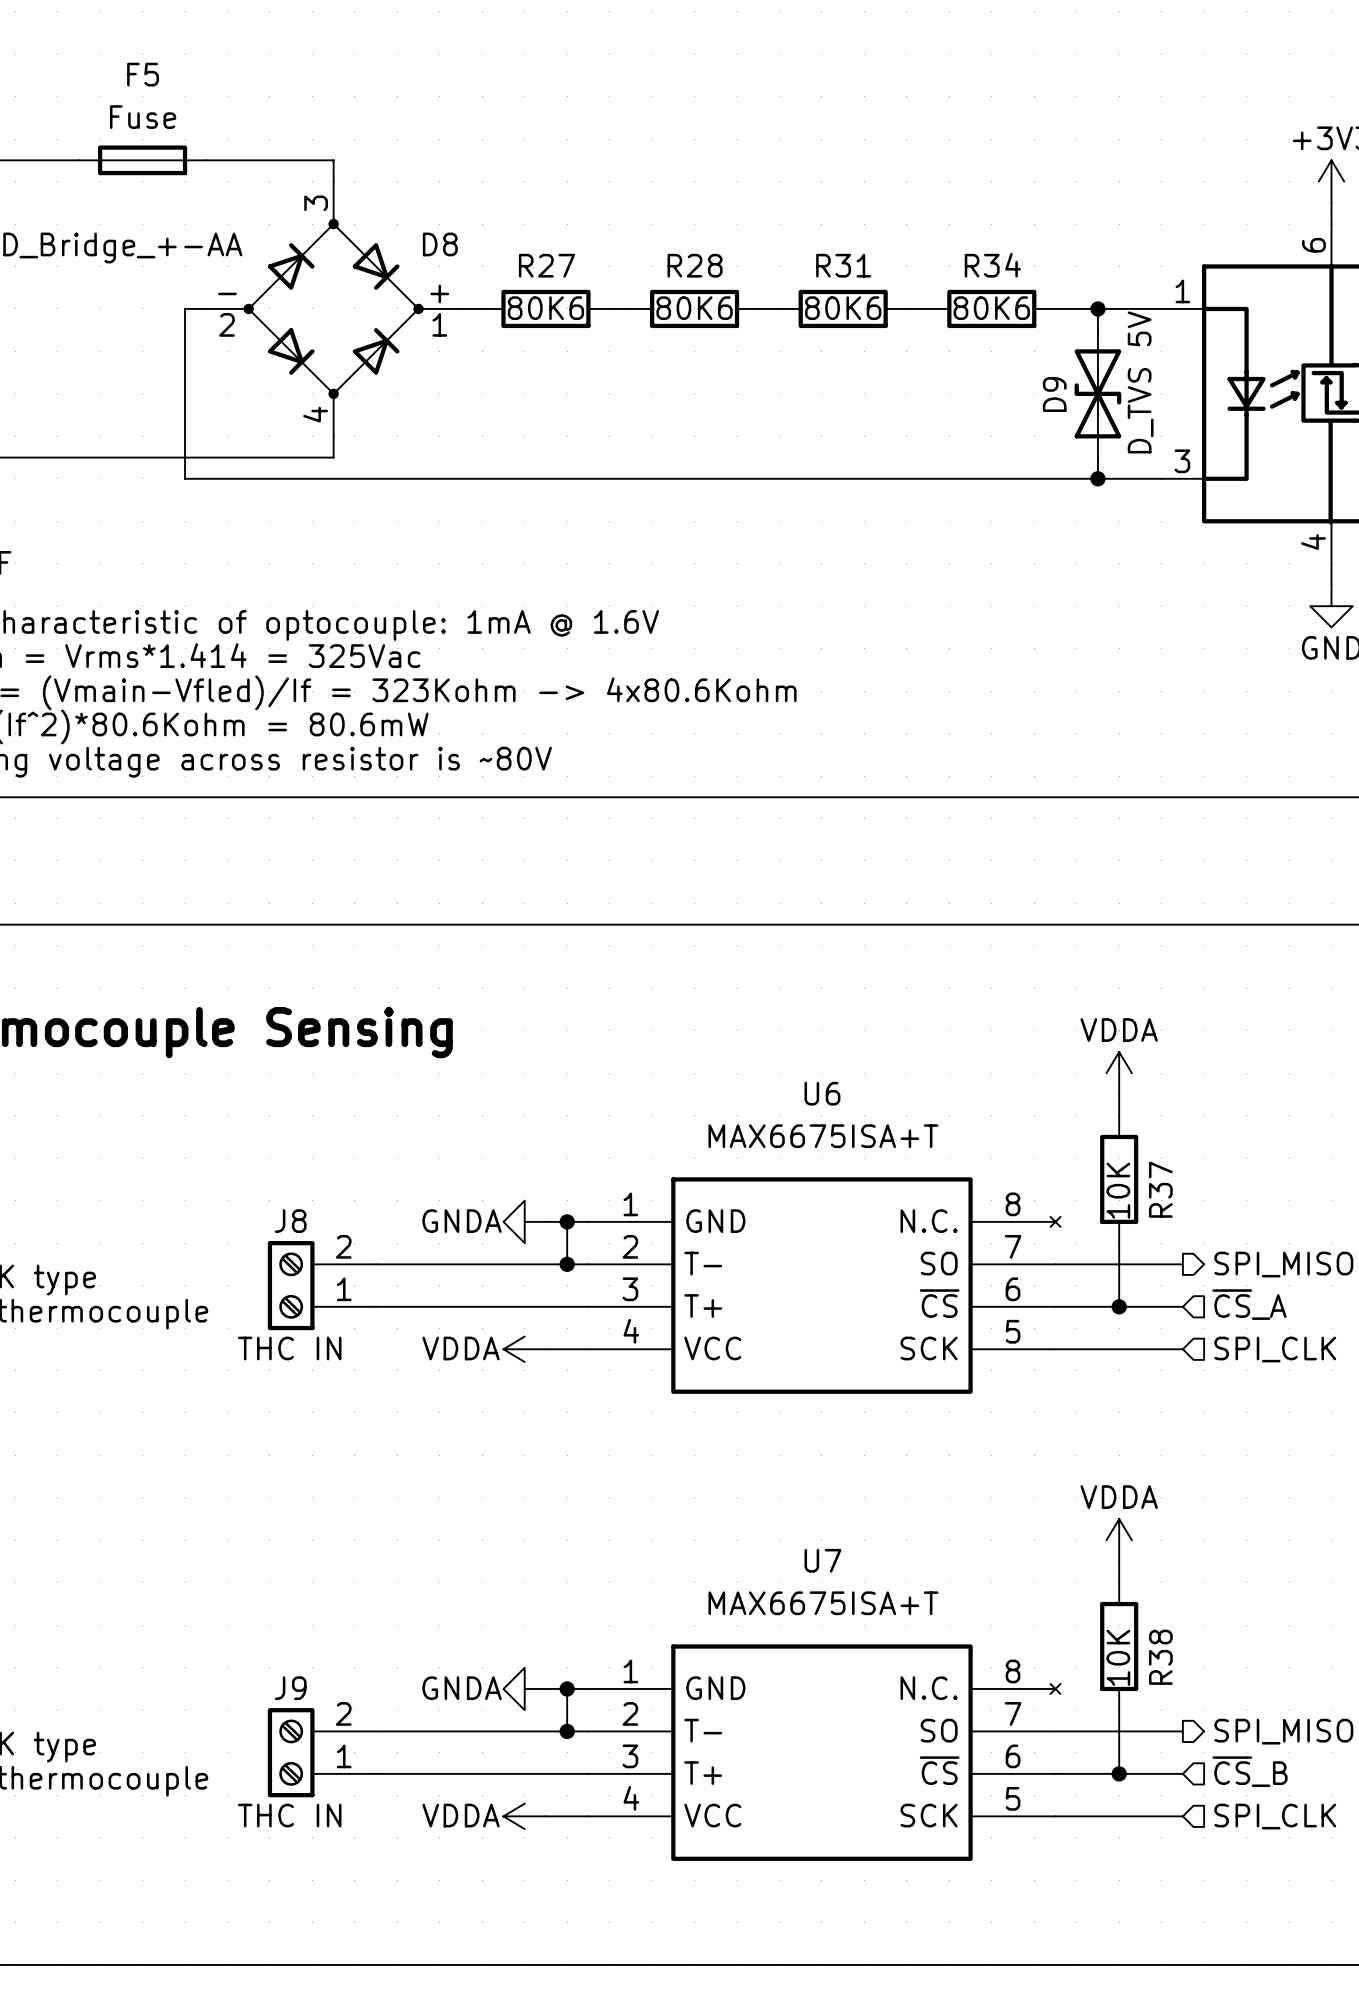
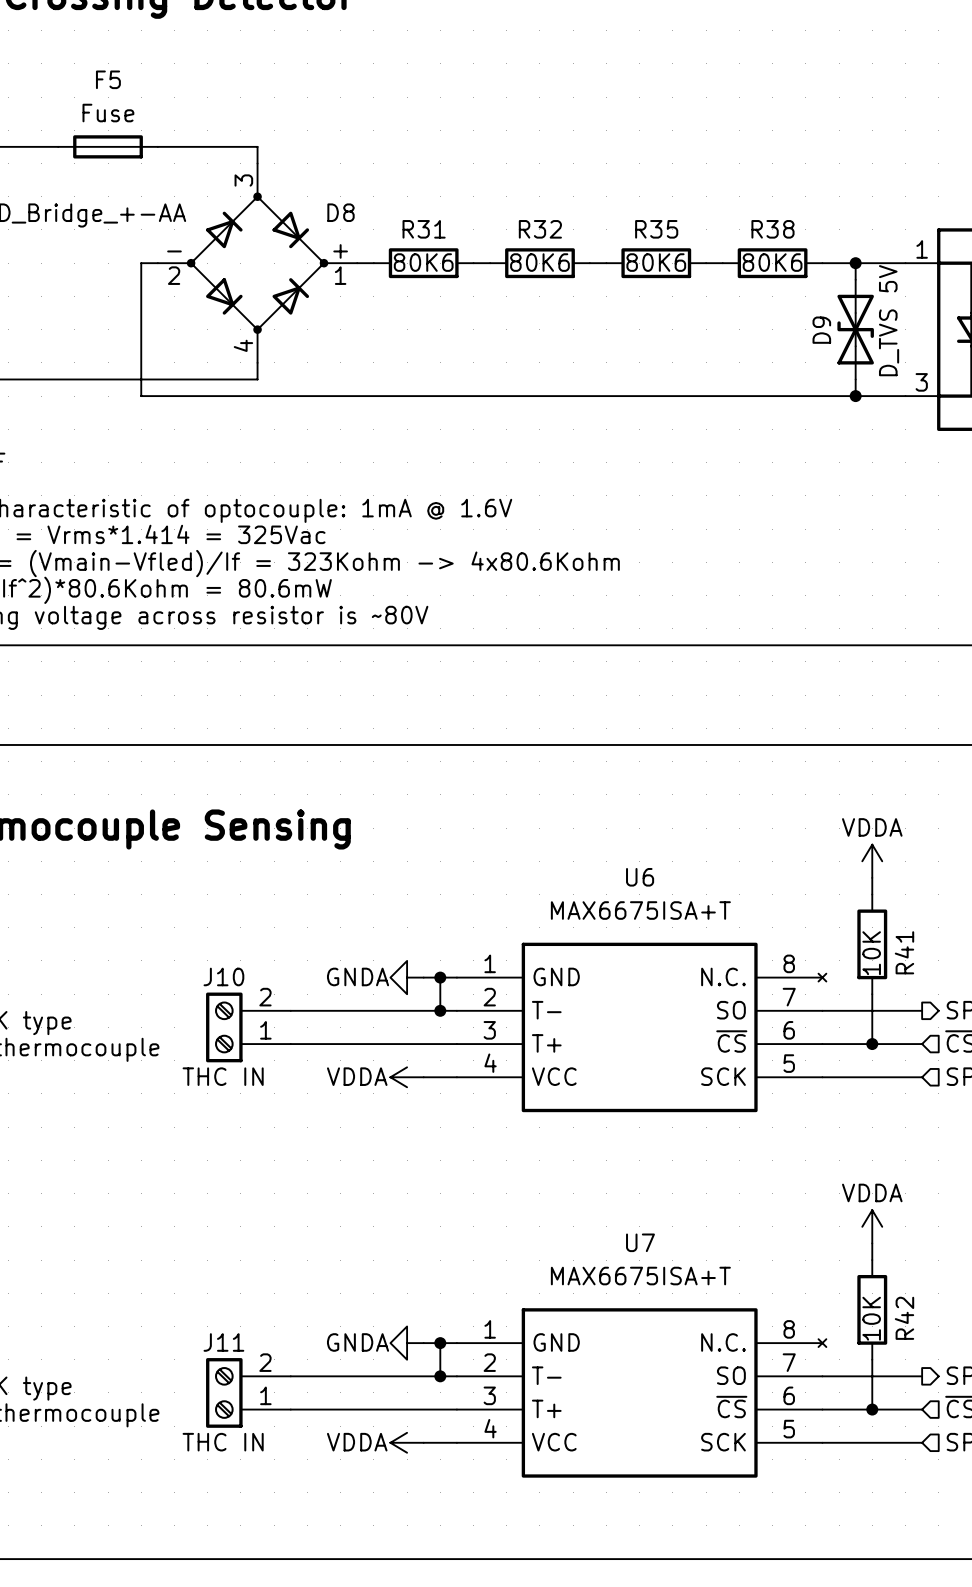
R27 name: R27 (546, 265) -> R31 (424, 229)
R28 name: R28 (695, 265) -> R32 (540, 229)
R31 name: R31 (843, 265) -> R35 (656, 229)
R34 name: R34 (992, 265) -> R38 (772, 229)
R37 name: R37 (1160, 1189) -> R41 (904, 952)
J8 name: J8 (290, 1221) -> J10 (223, 976)
R38 name: R38 (1160, 1657) -> R42 (904, 1318)
J9 name: J9 (290, 1688) -> J11 (223, 1342)

